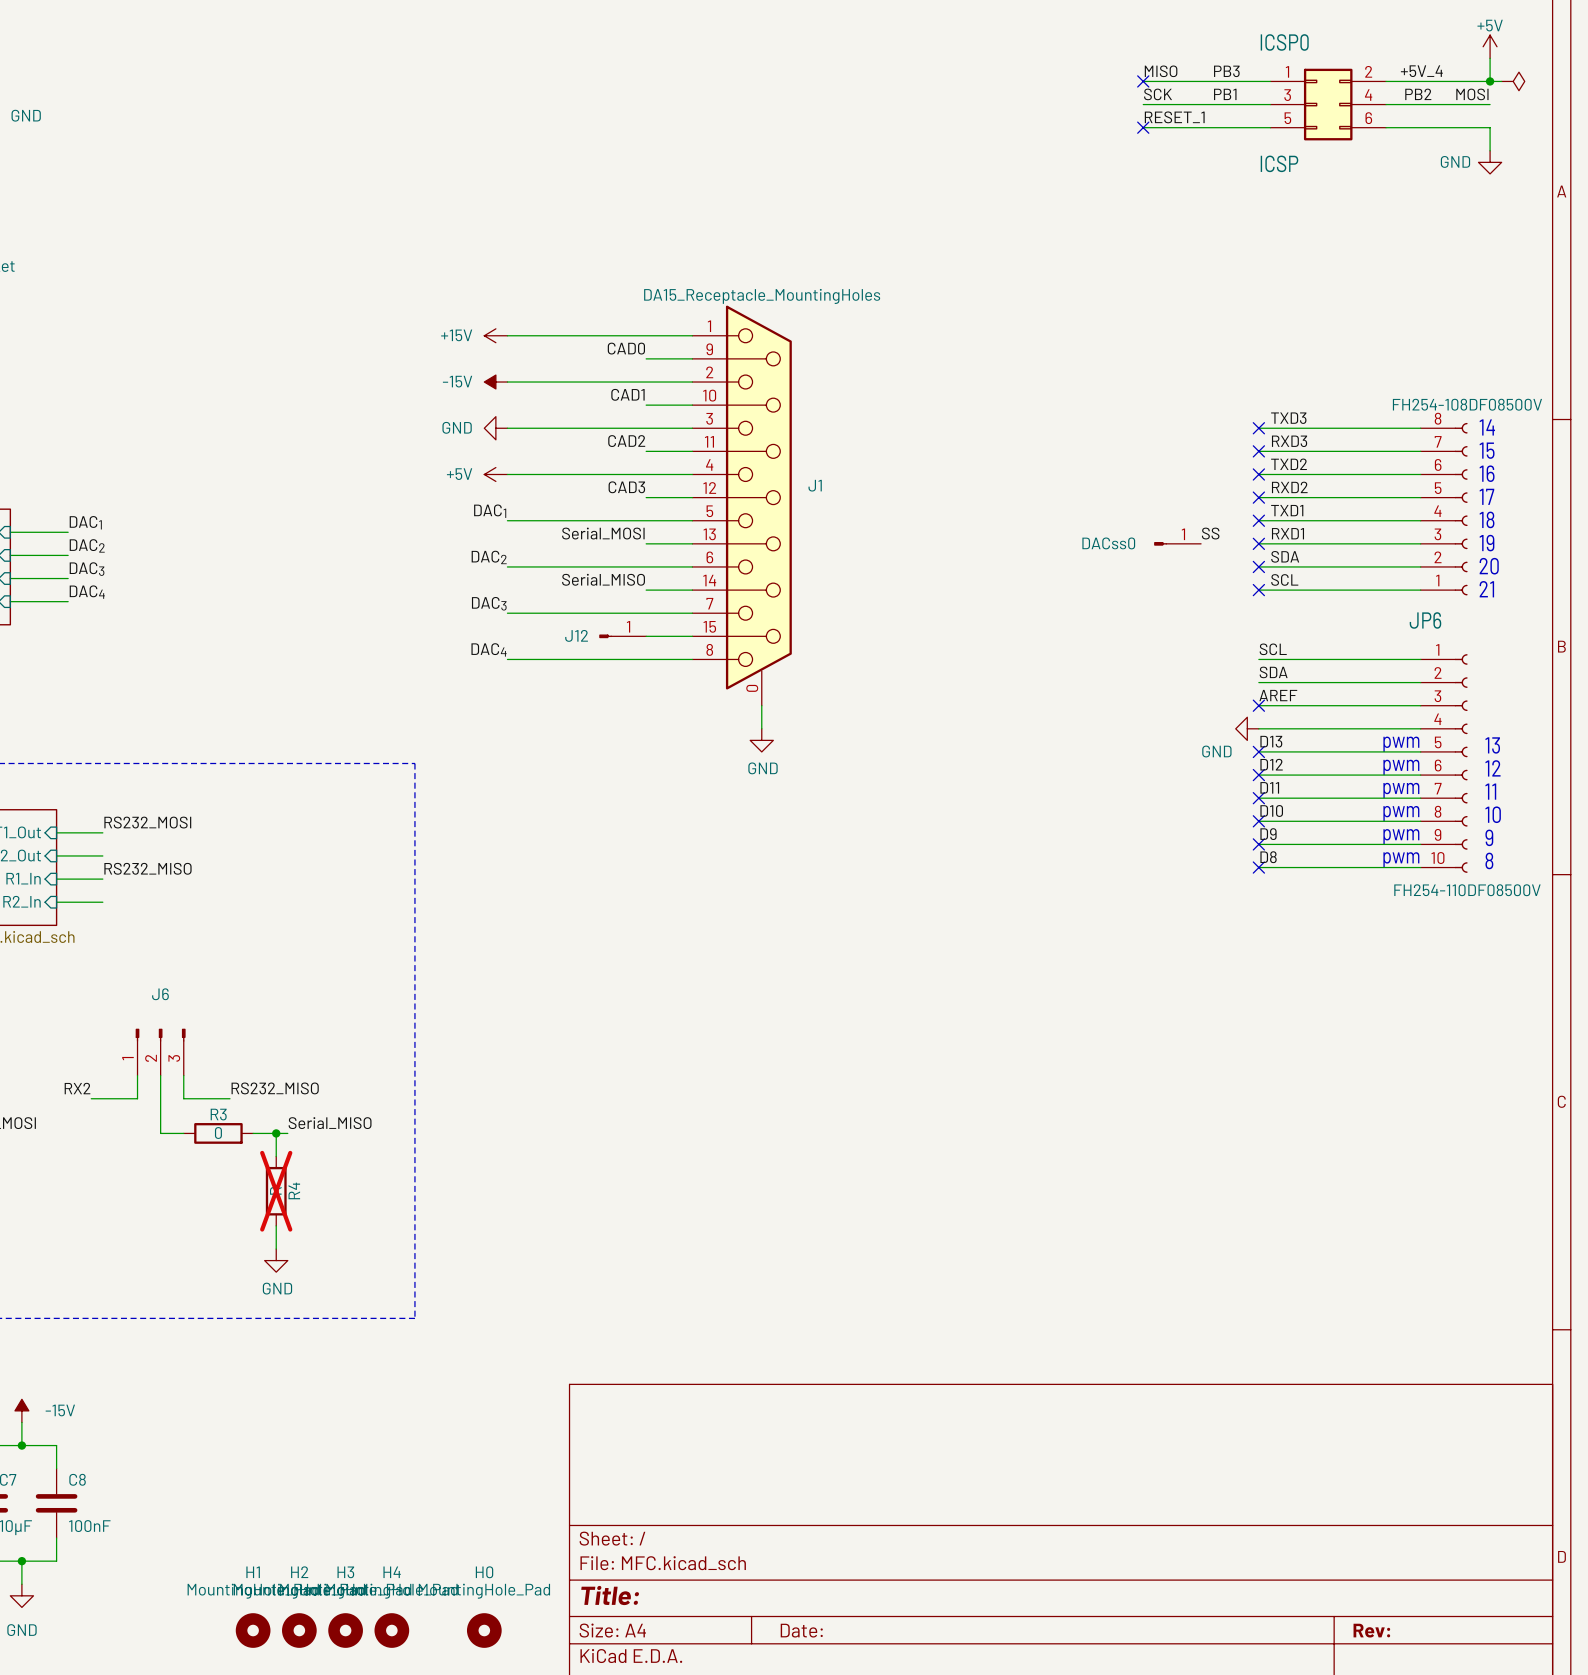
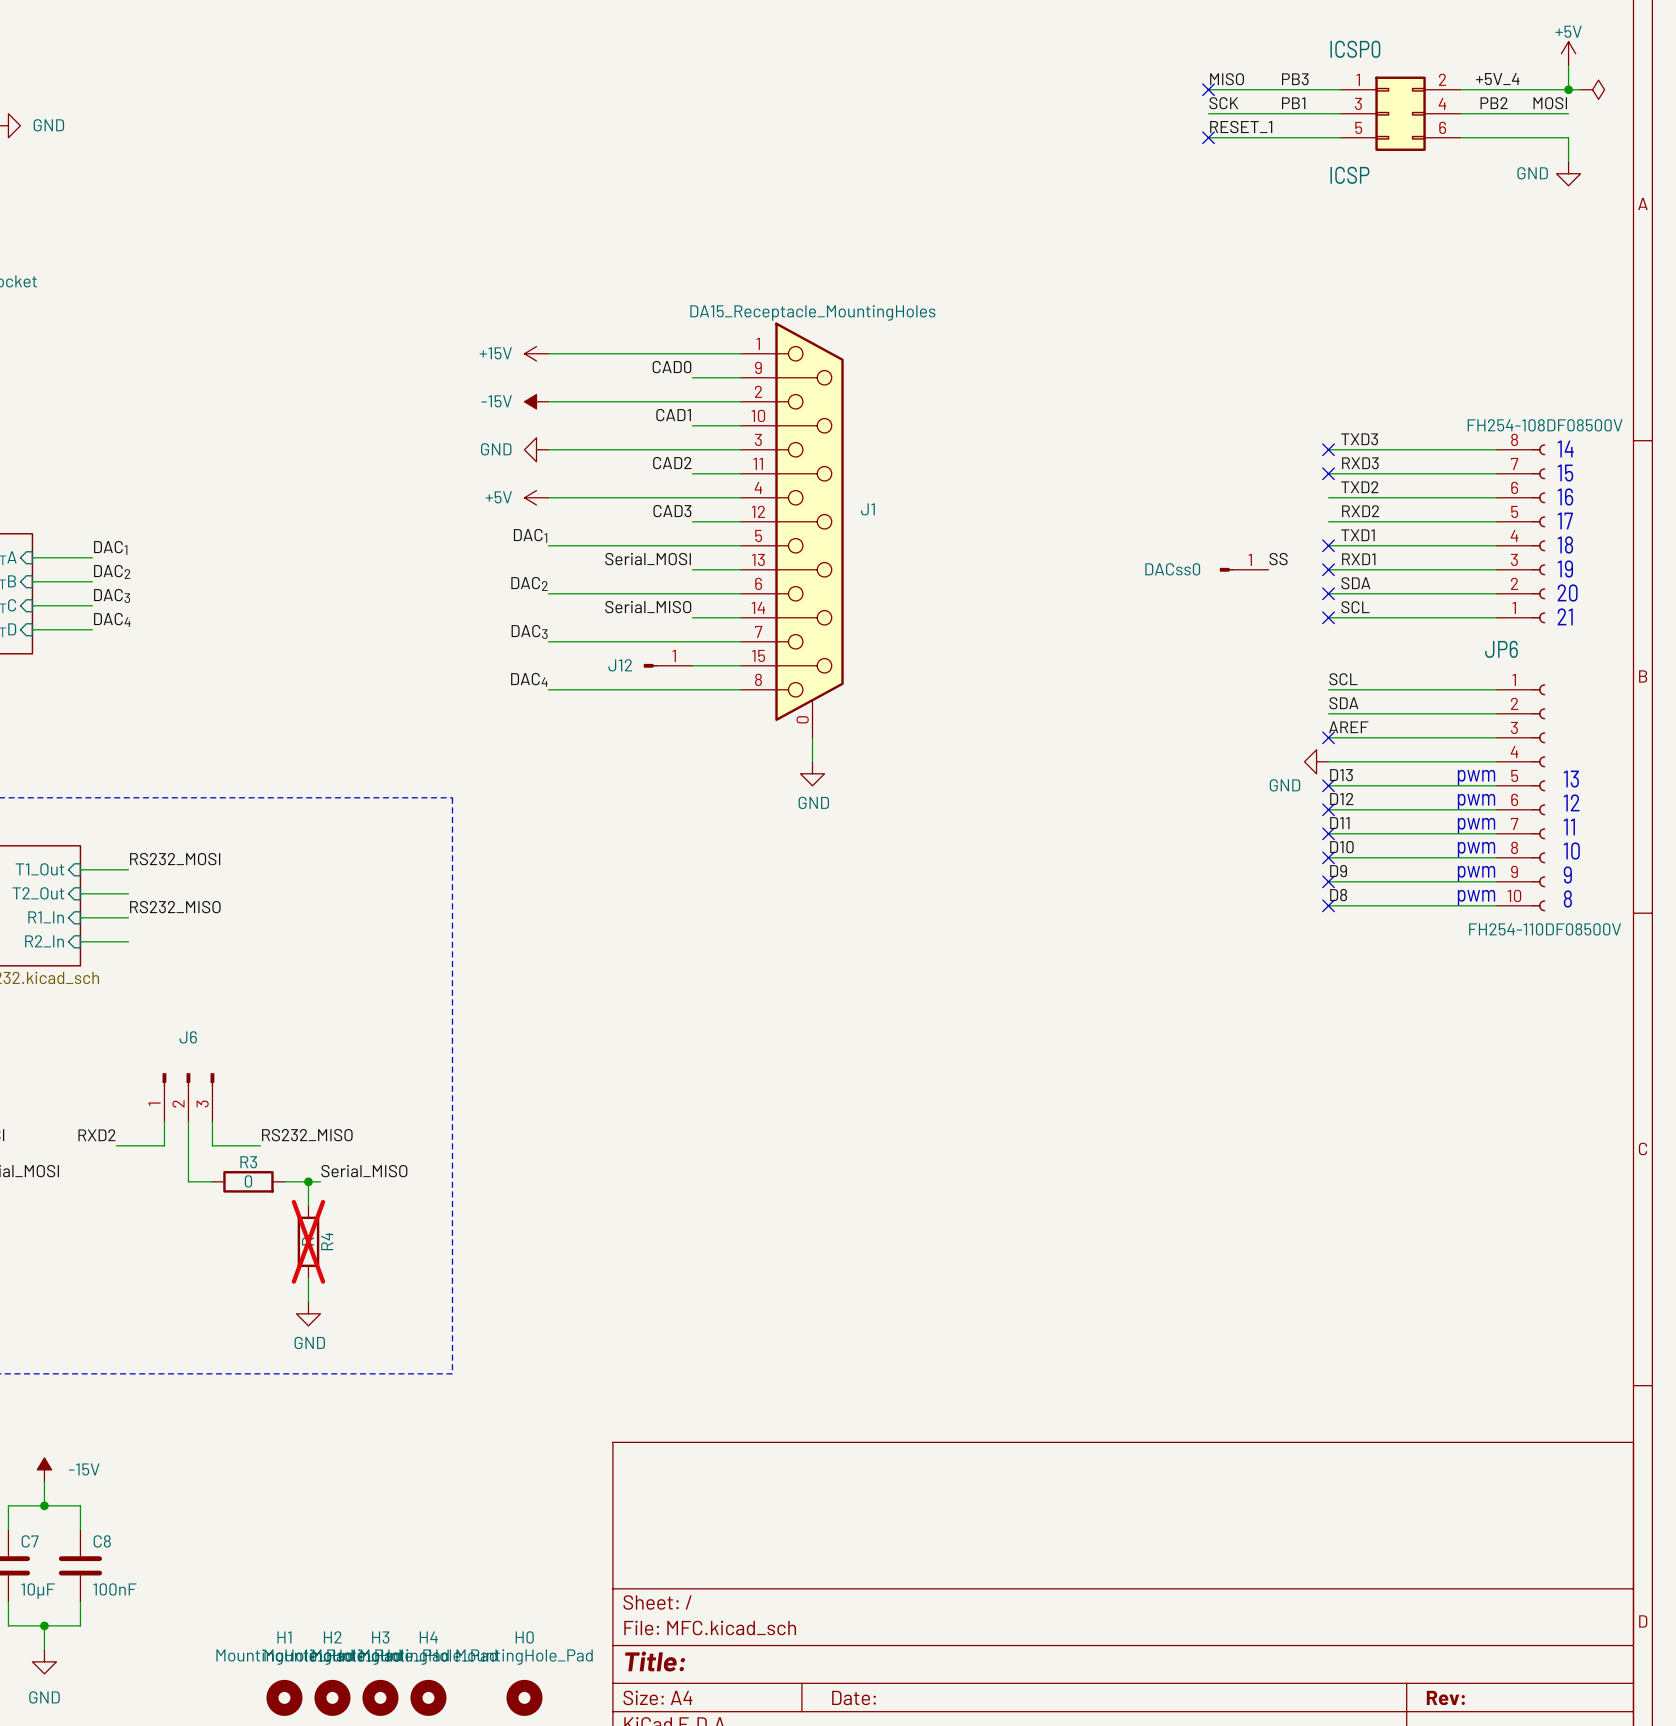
no-connect mark: (1258, 474) -> none
no-connect mark: (1258, 497) -> none
label: RX2 (77, 1088) -> RXD2 (96, 1135)

